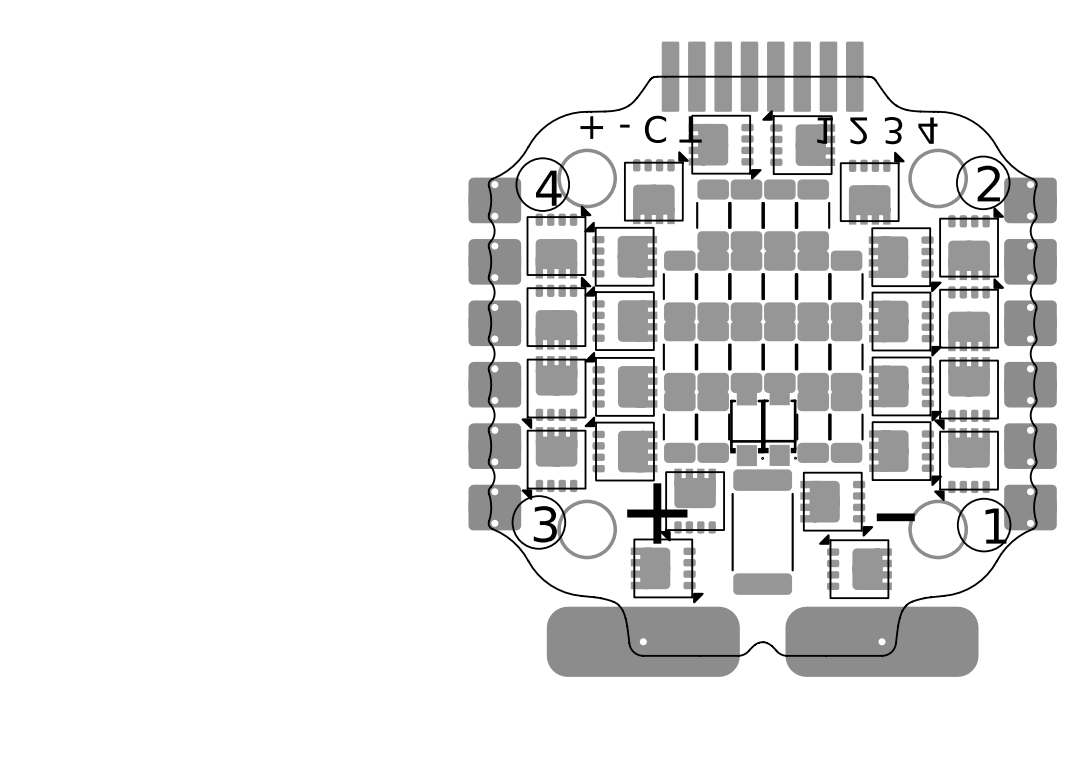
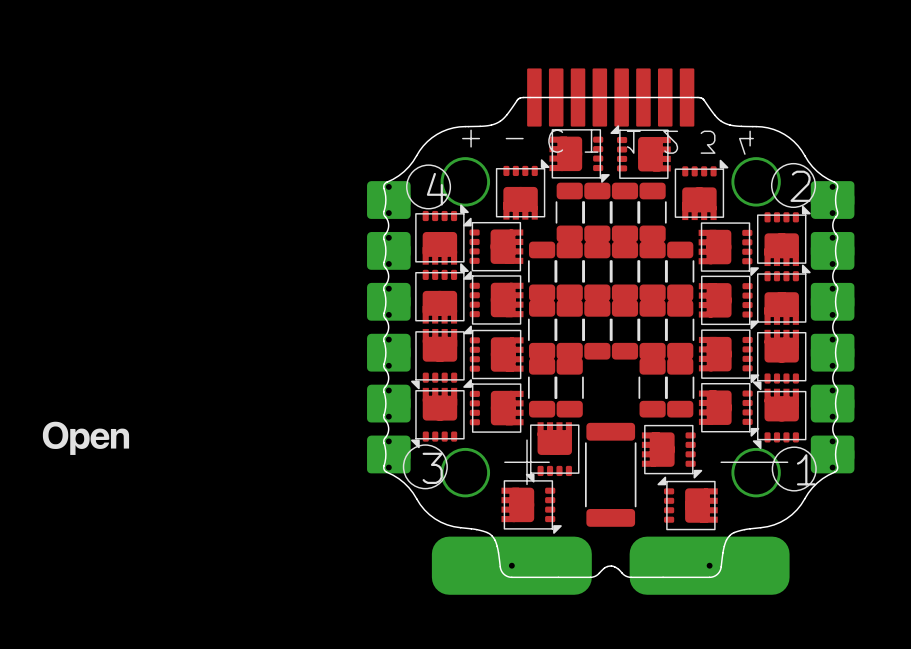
part: (746, 425) -> none
part: (779, 425) -> none
drawing: none -> [42, 421, 130, 455]

